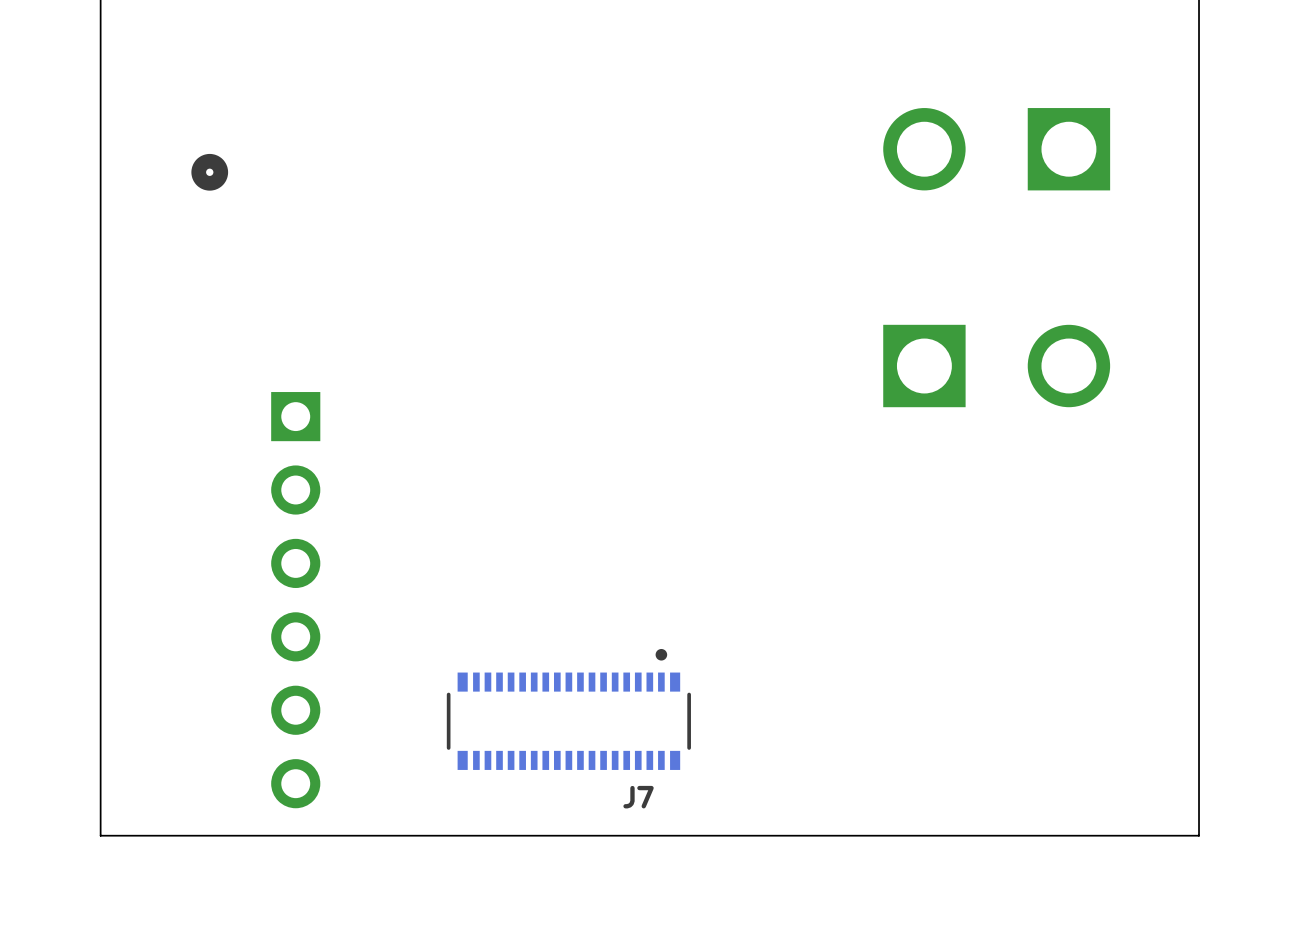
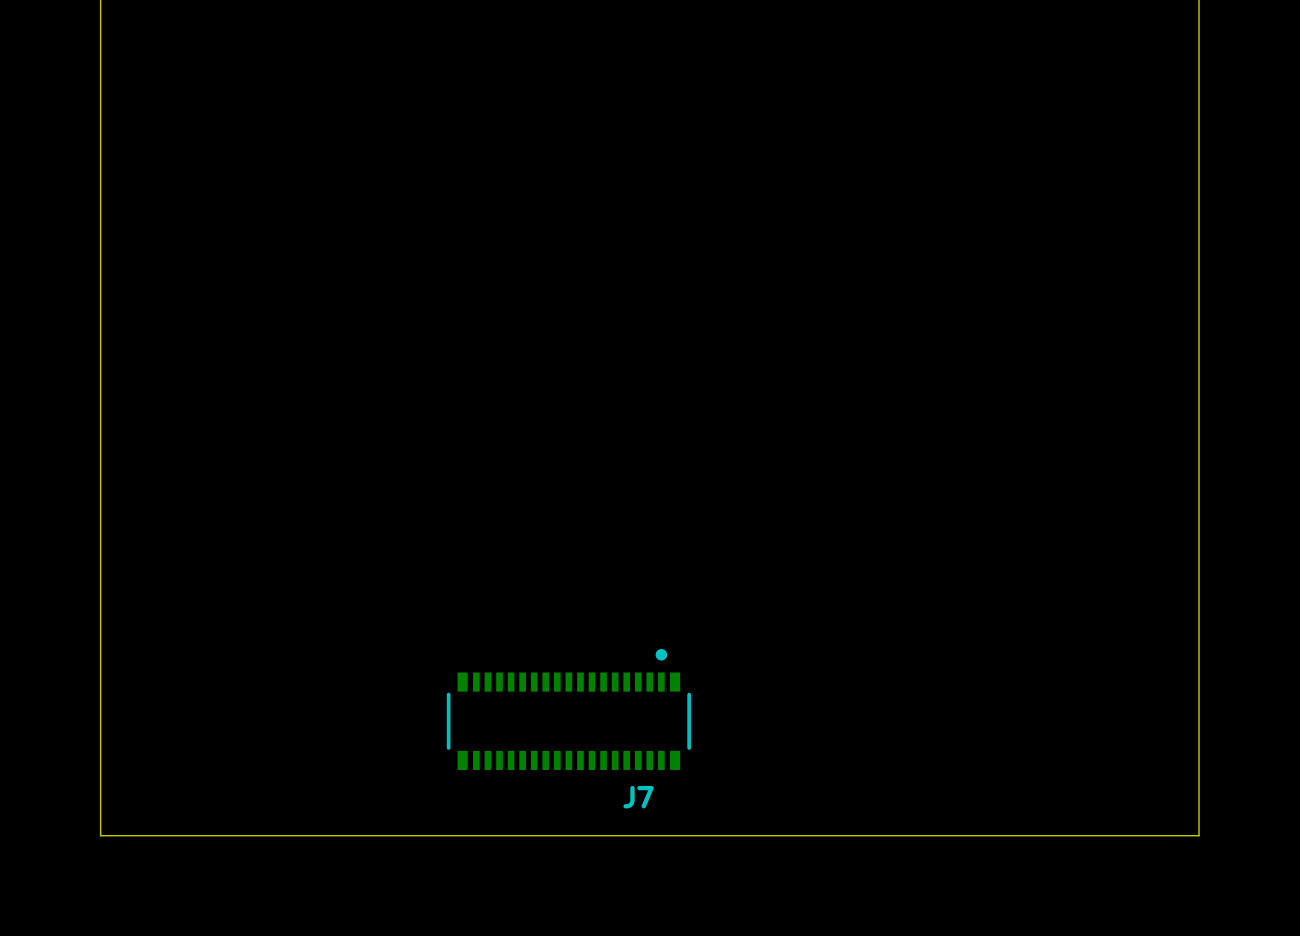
part: (996, 149) -> none
part: (209, 172) -> none
part: (996, 366) -> none
part: (295, 600) -> none

